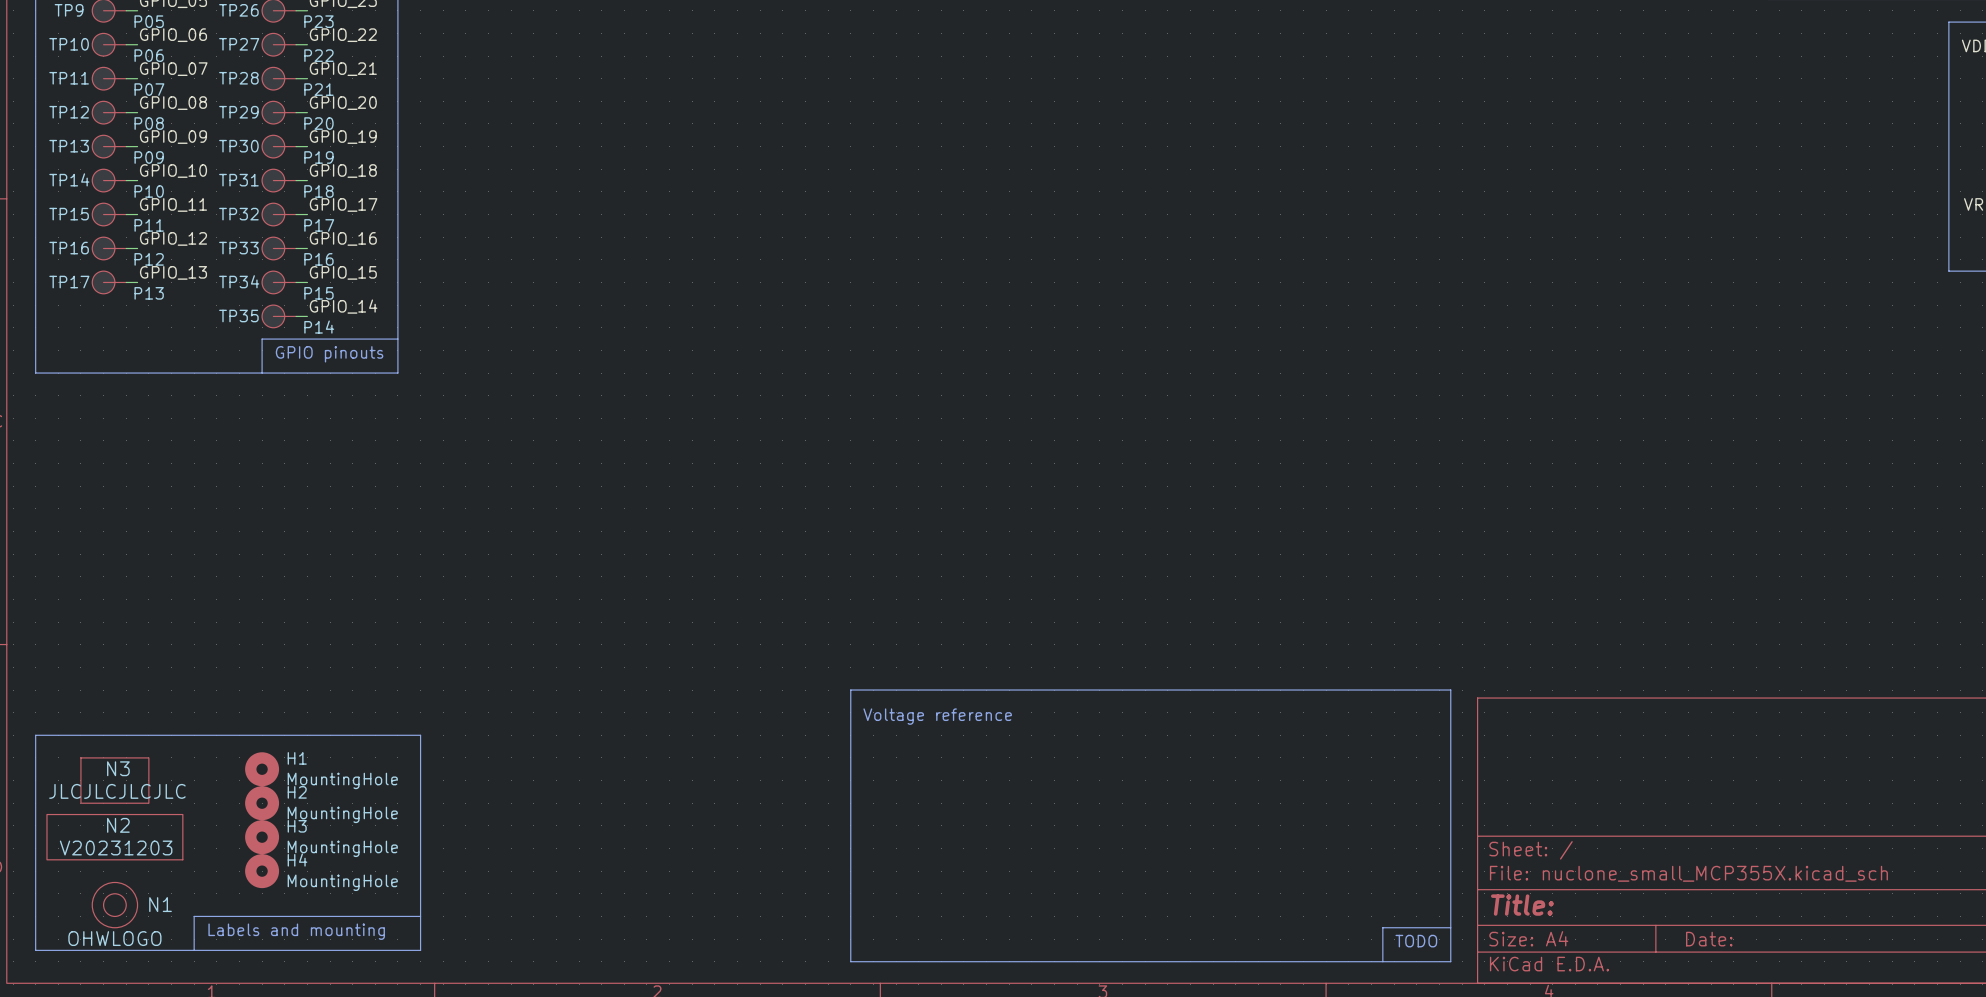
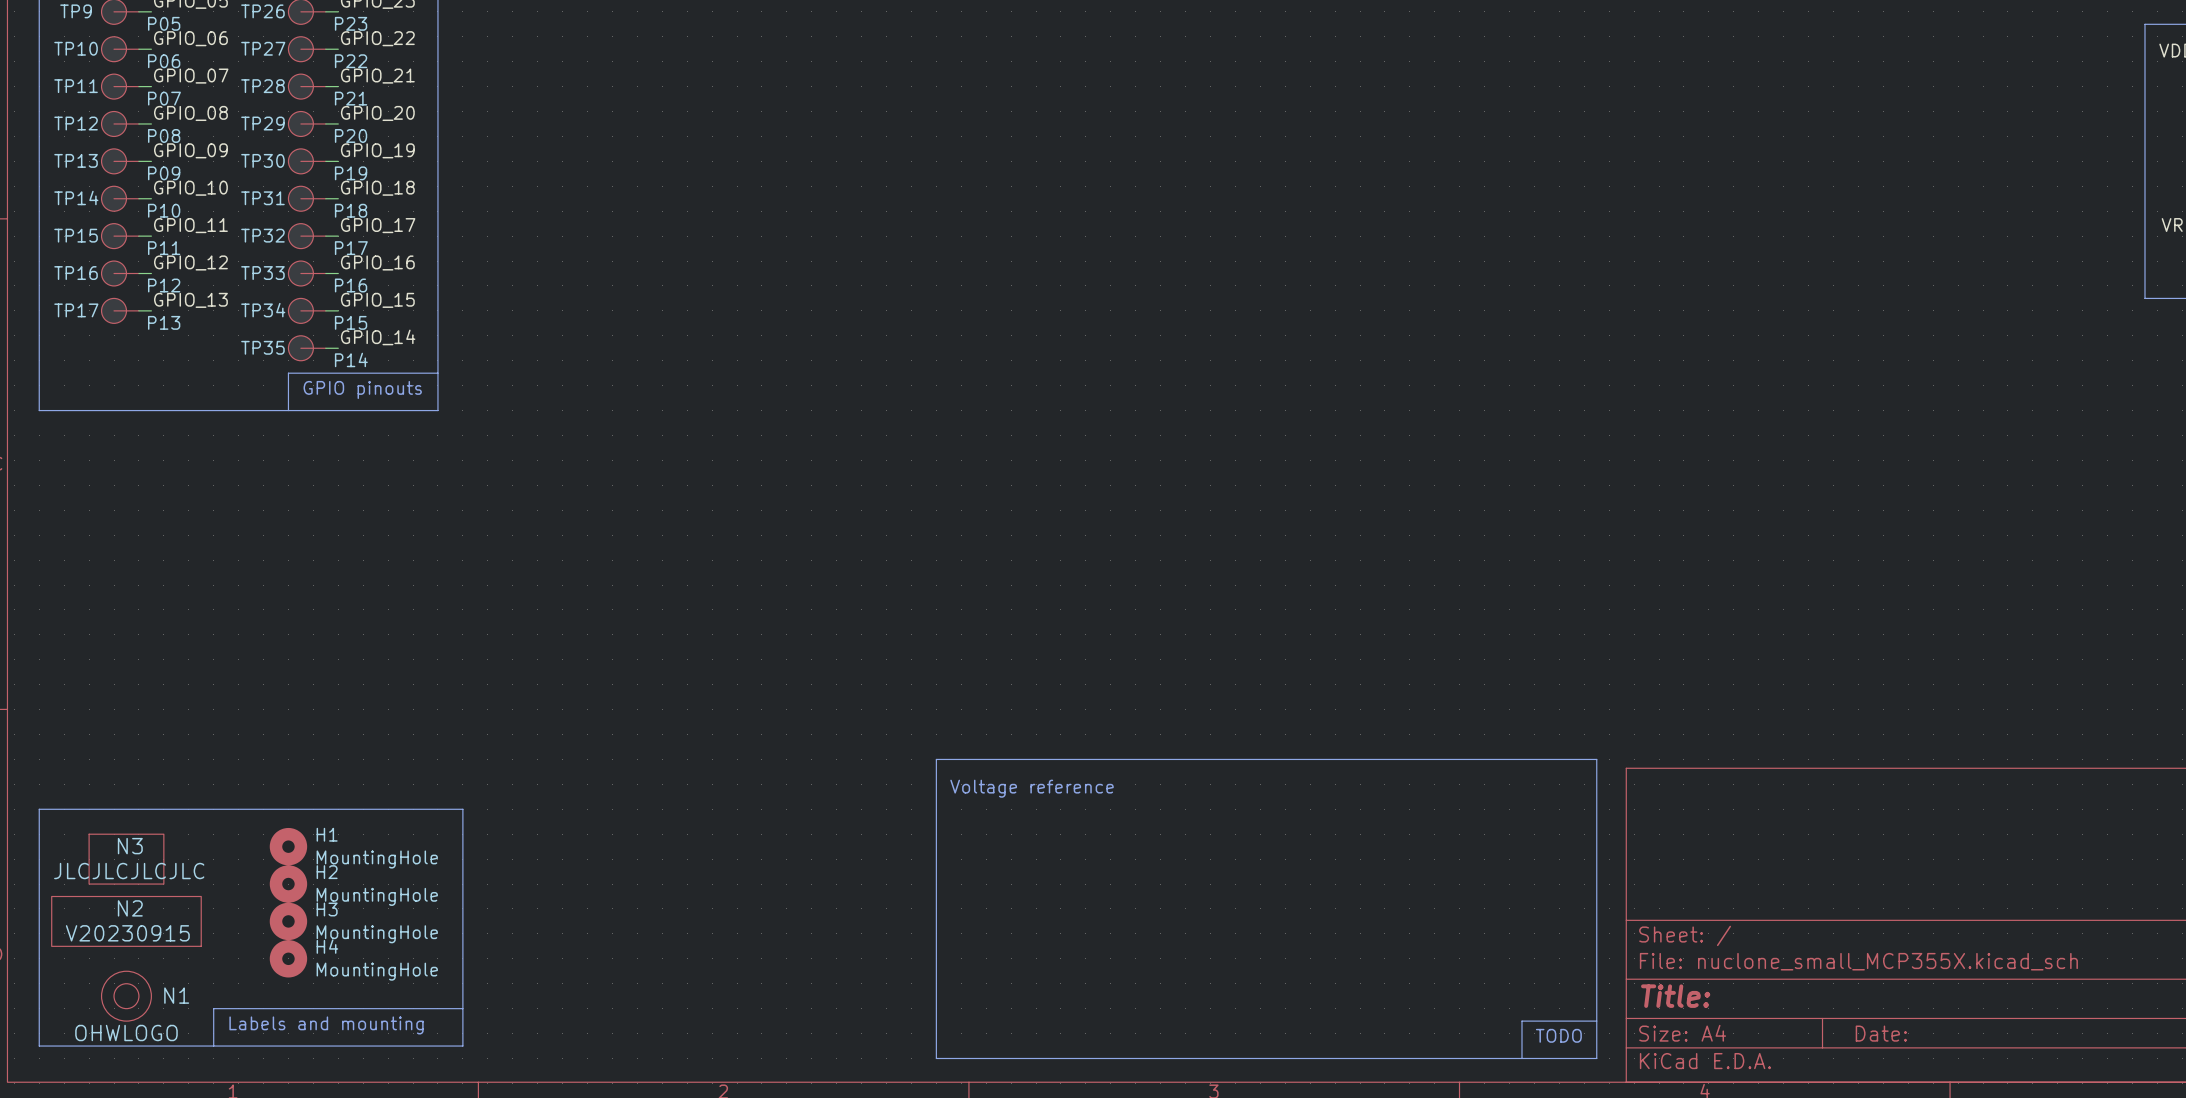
N2 value: V20231203 (116, 847) -> V20230915 (127, 933)

